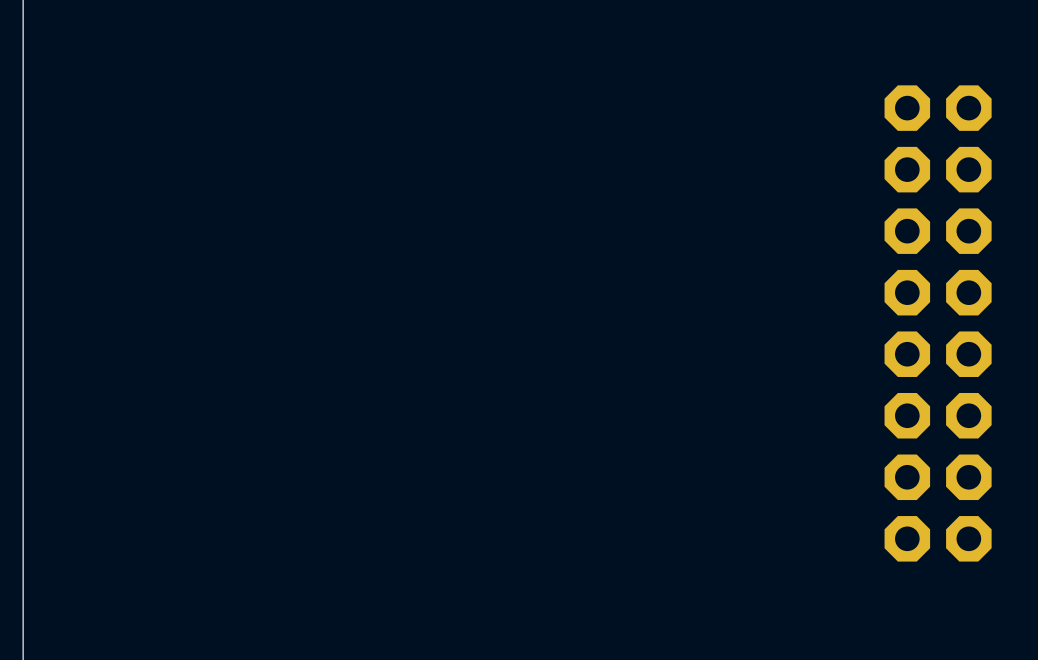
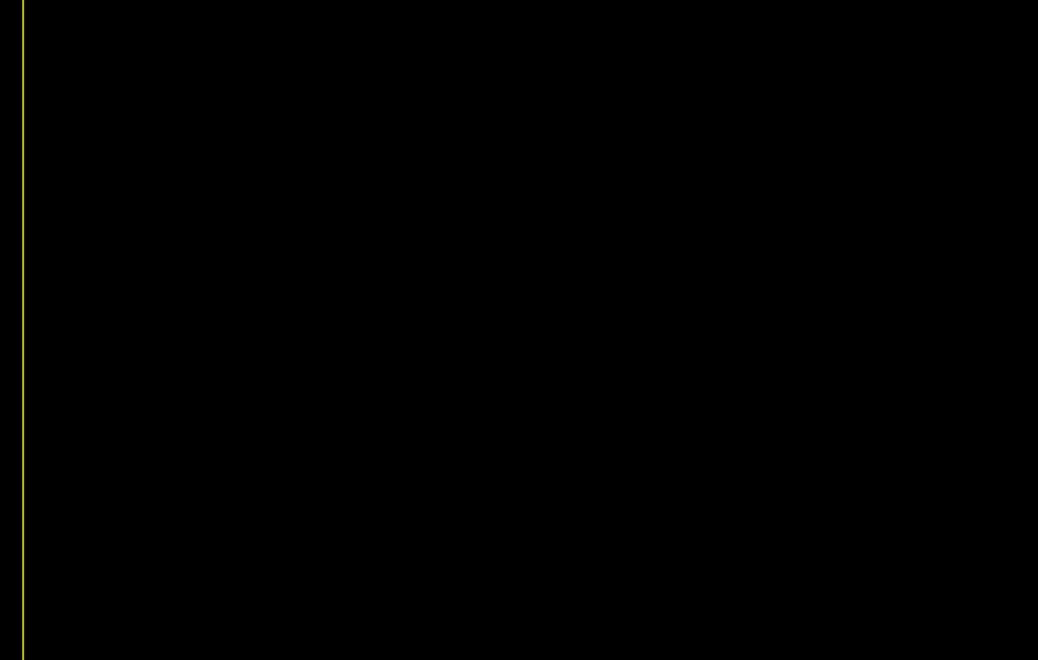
part: (938, 323) -> none

